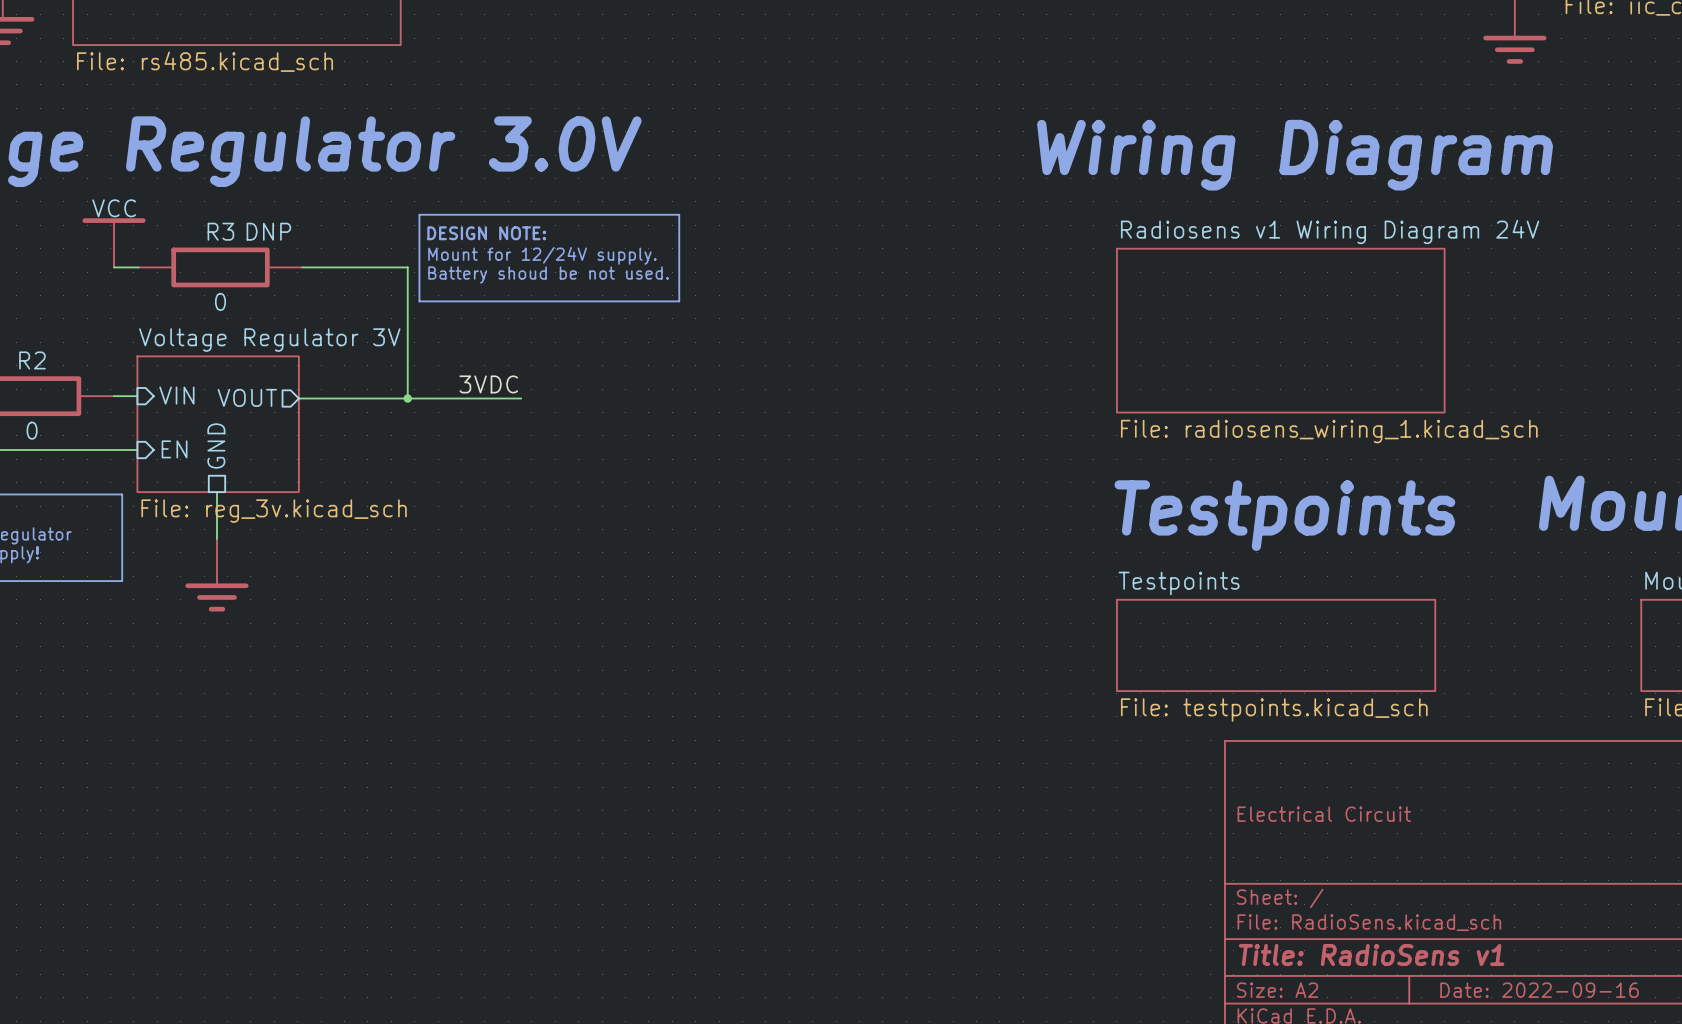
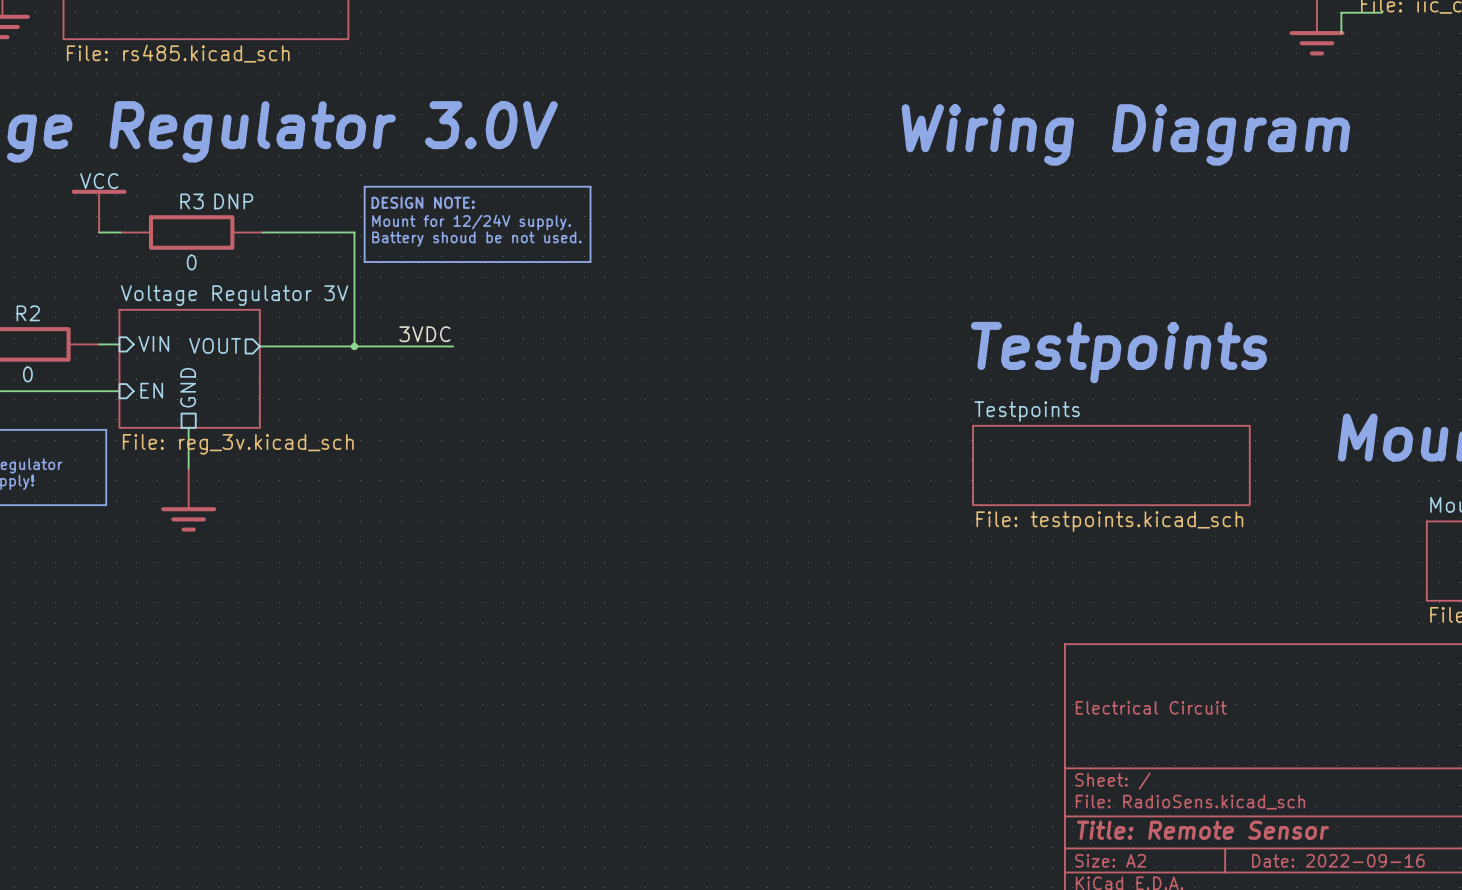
wire: none -> (1382, 12) (1341, 12) (1341, 33)
sheet Radiosens v1 Wiring Diagram 24V: File: radiosens_wiring_1.kicad_sch (1280, 330) -> none
text position: Testpoints (1284, 515) -> Testpoints (1119, 352)
sheet Testpoints position: (1276, 645) -> (1111, 465)
title block: Title: RadioSens v1 (1371, 954) -> Title: Remote Sensor (1202, 830)

